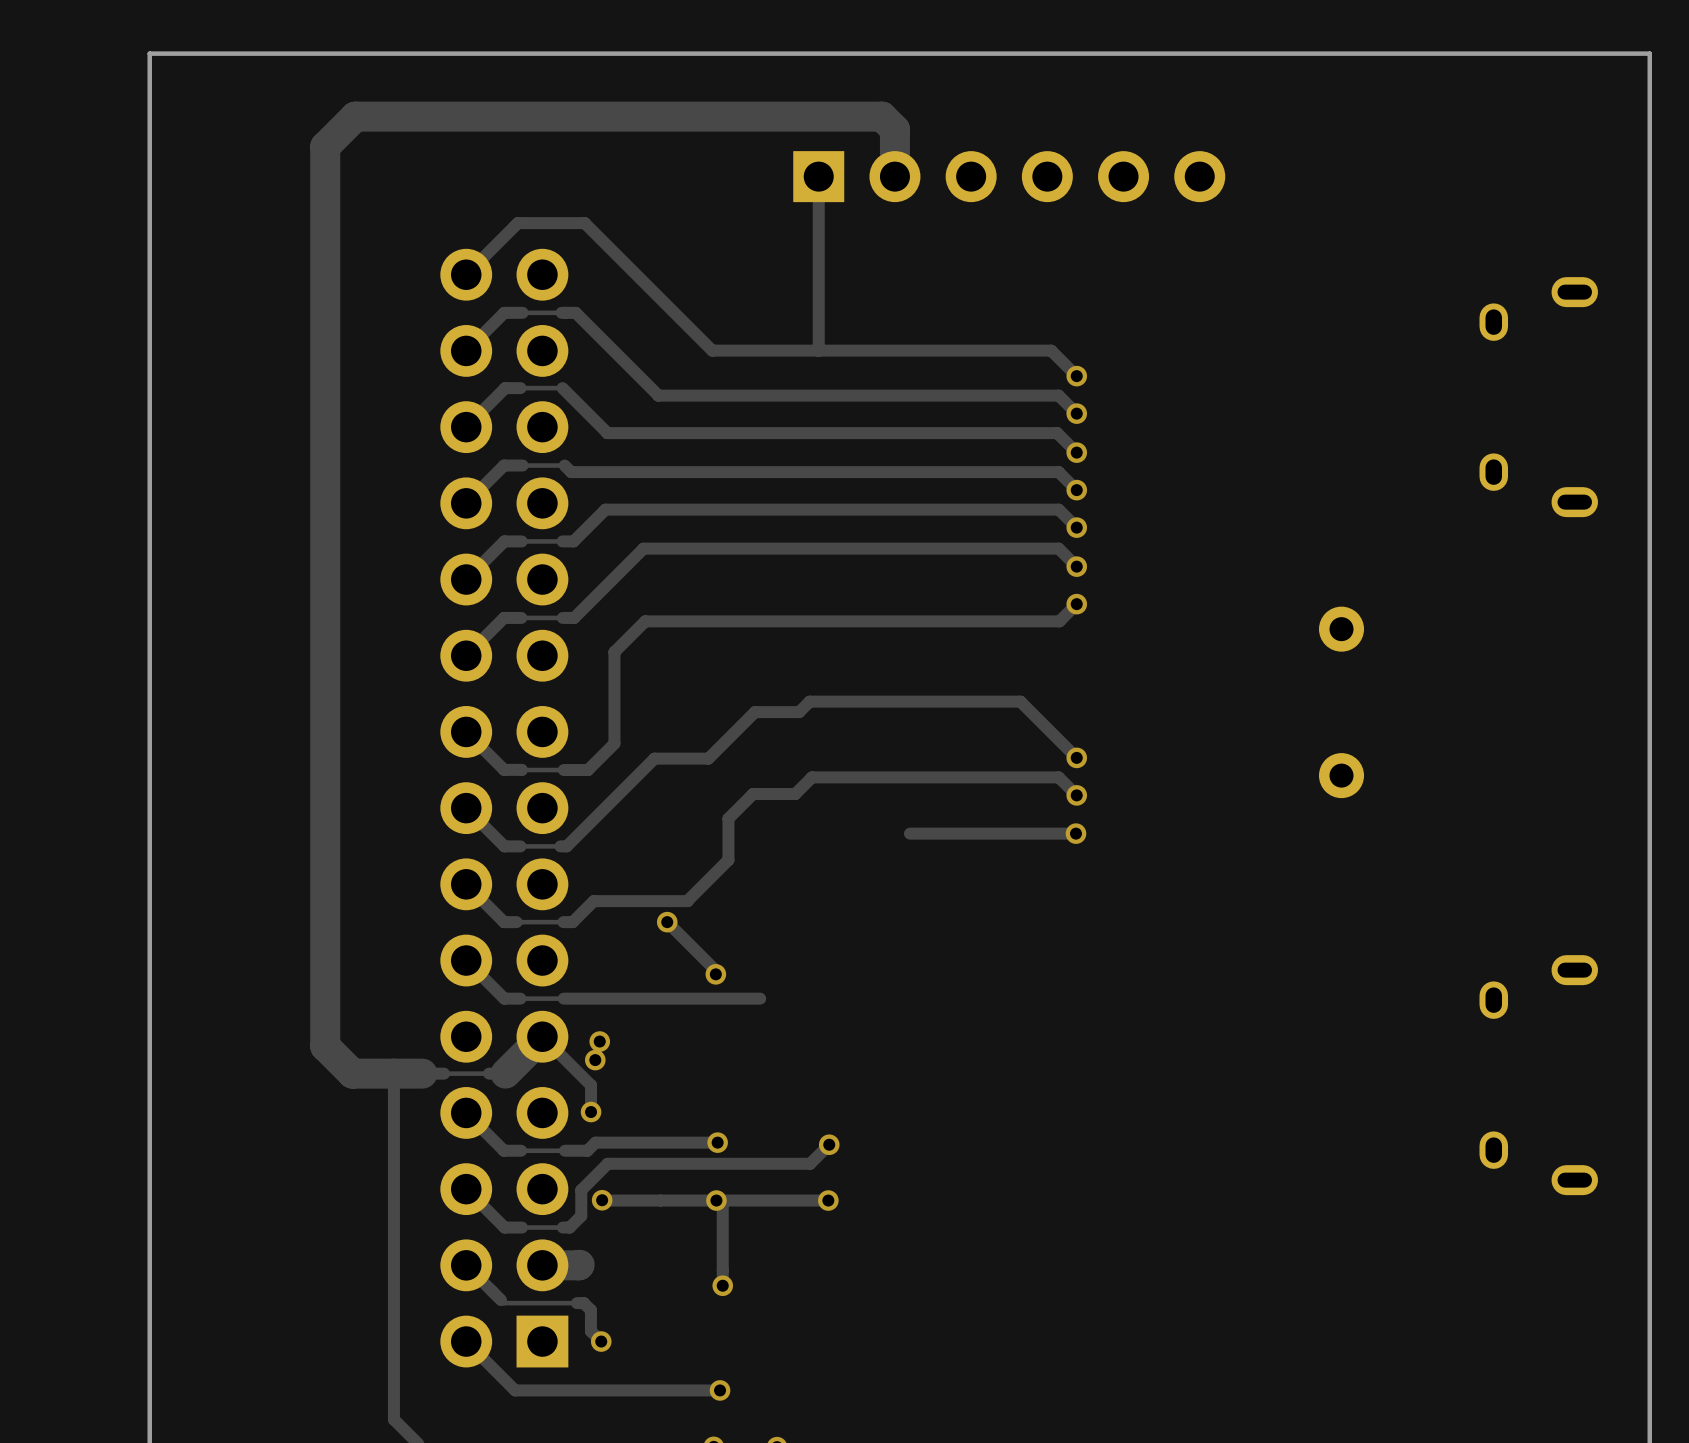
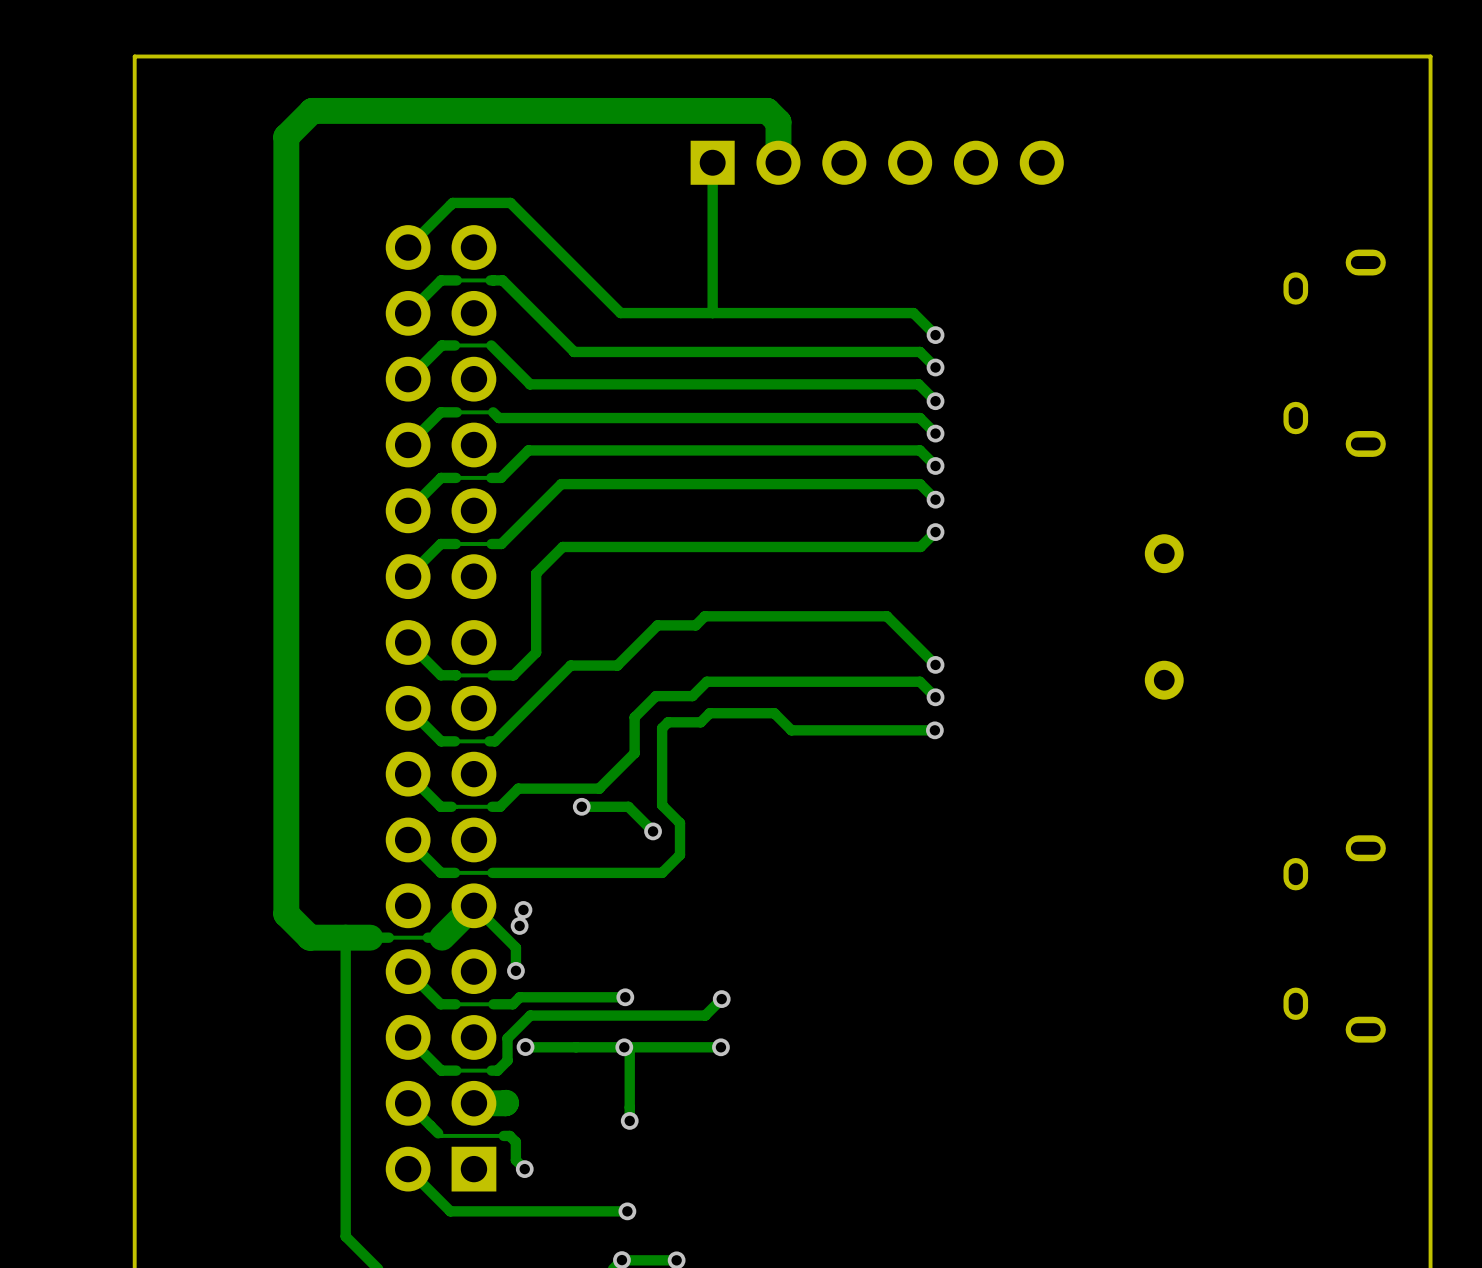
track: none -> (791, 730) (774, 713) (709, 713) (700, 722) (668, 722) (662, 728) (662, 805) (680, 823) (680, 855) (662, 872)
track: (667, 922) (715, 970) (715, 974) -> (581, 806) (628, 806) (653, 831)
via position: (715, 974) -> (653, 831)

